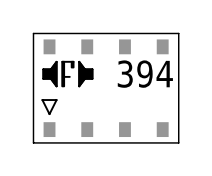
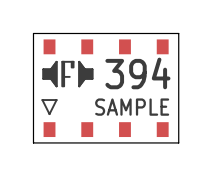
394 value: none -> SAMPLE (132, 107)

